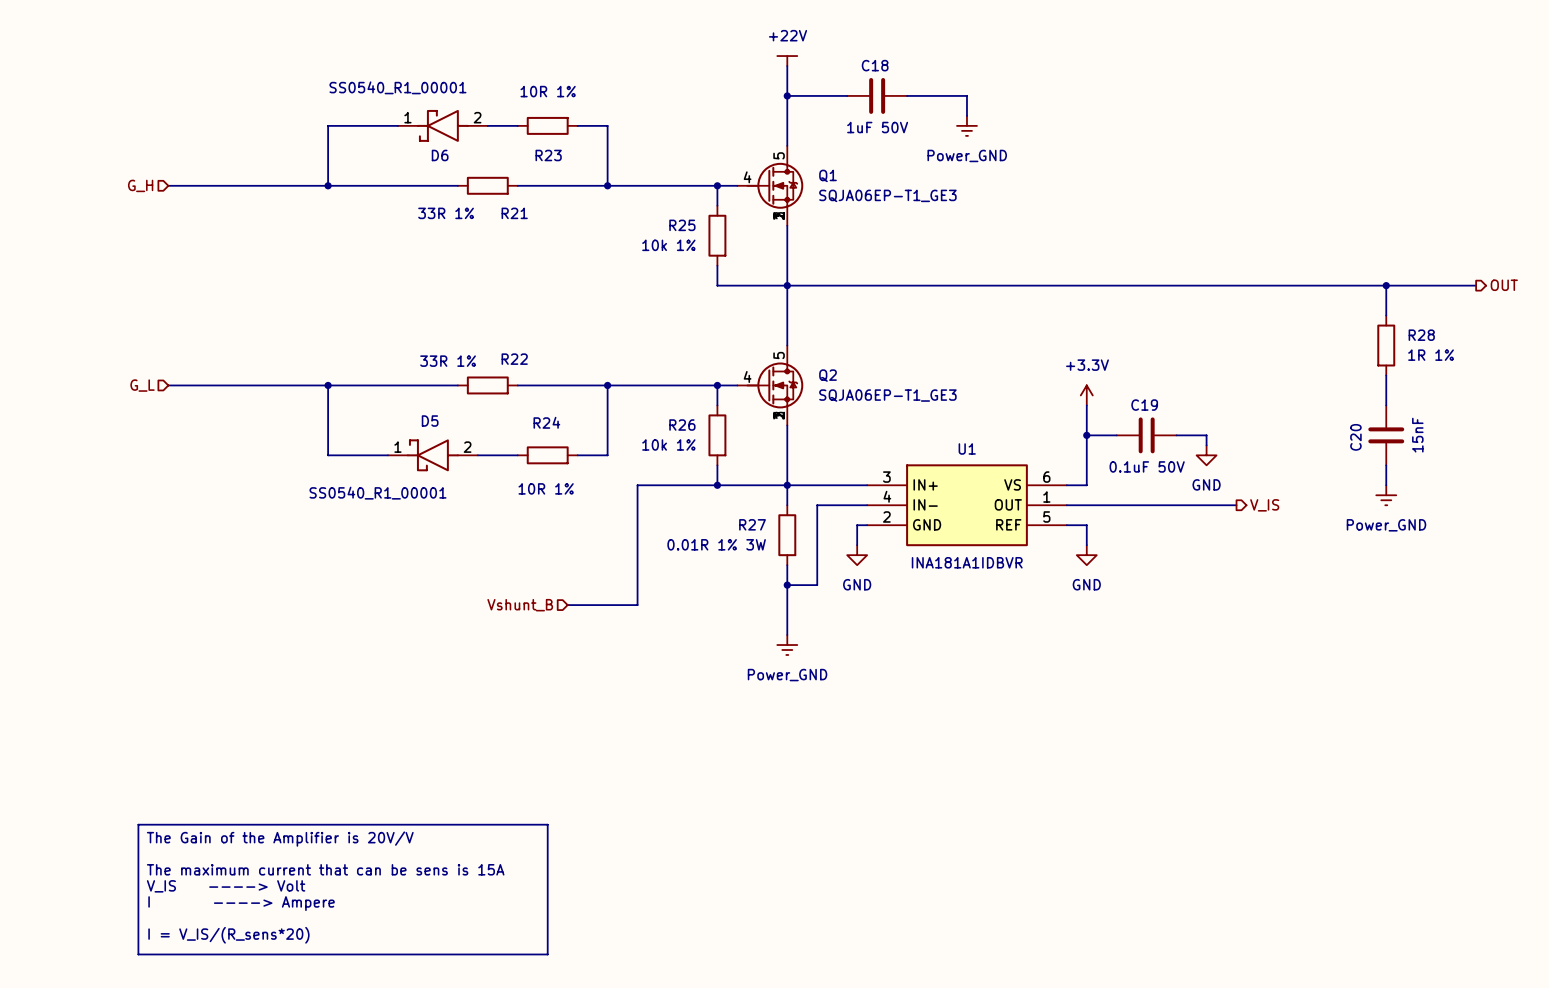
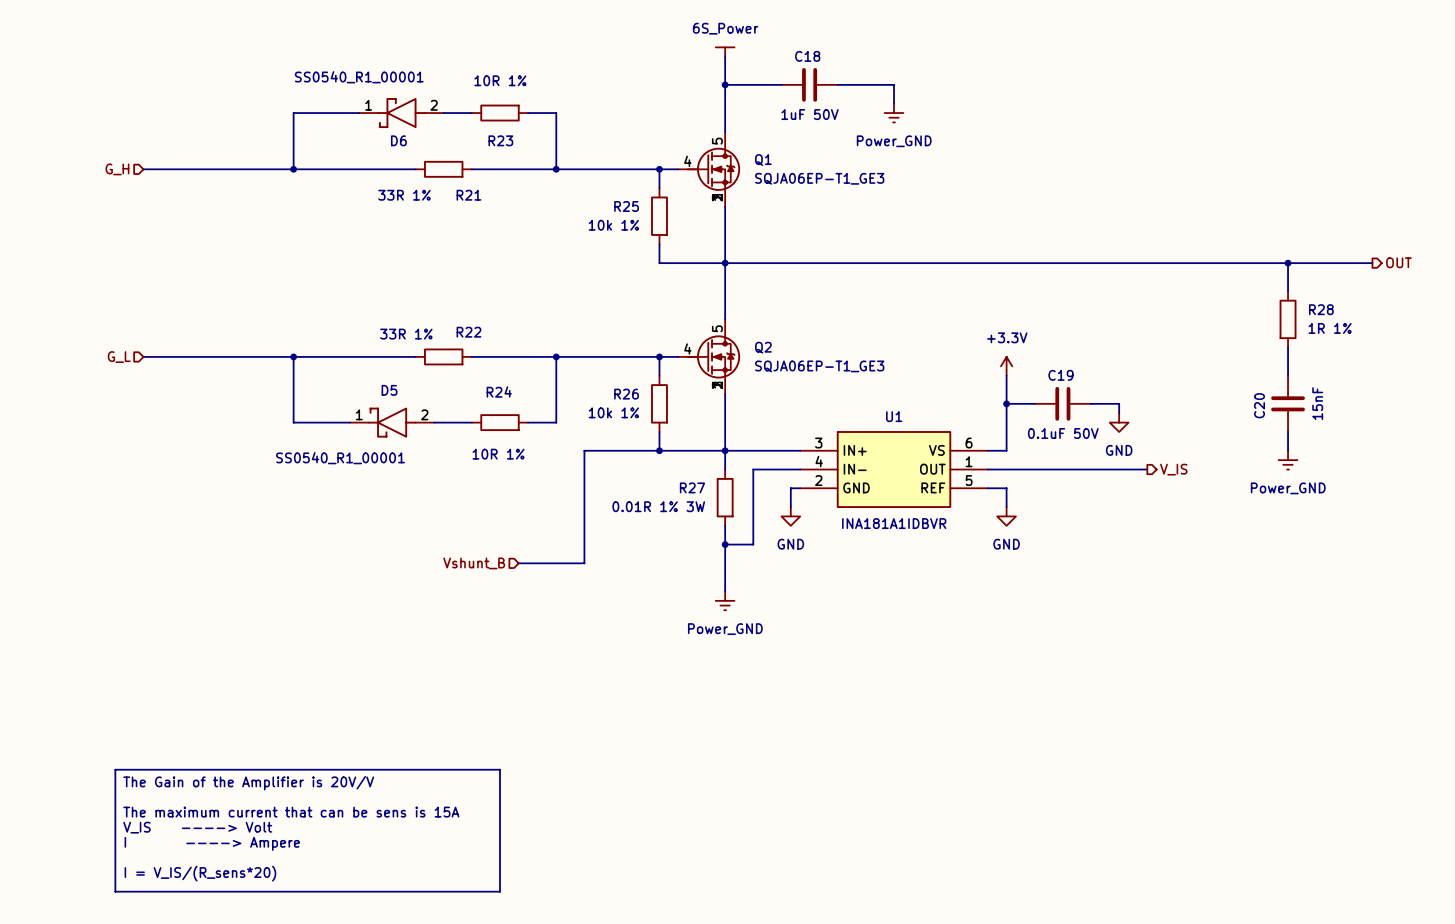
power symbol: +22V (787, 61) -> 6S_Power (725, 52)

